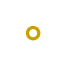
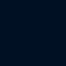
part: (33, 33) -> none

